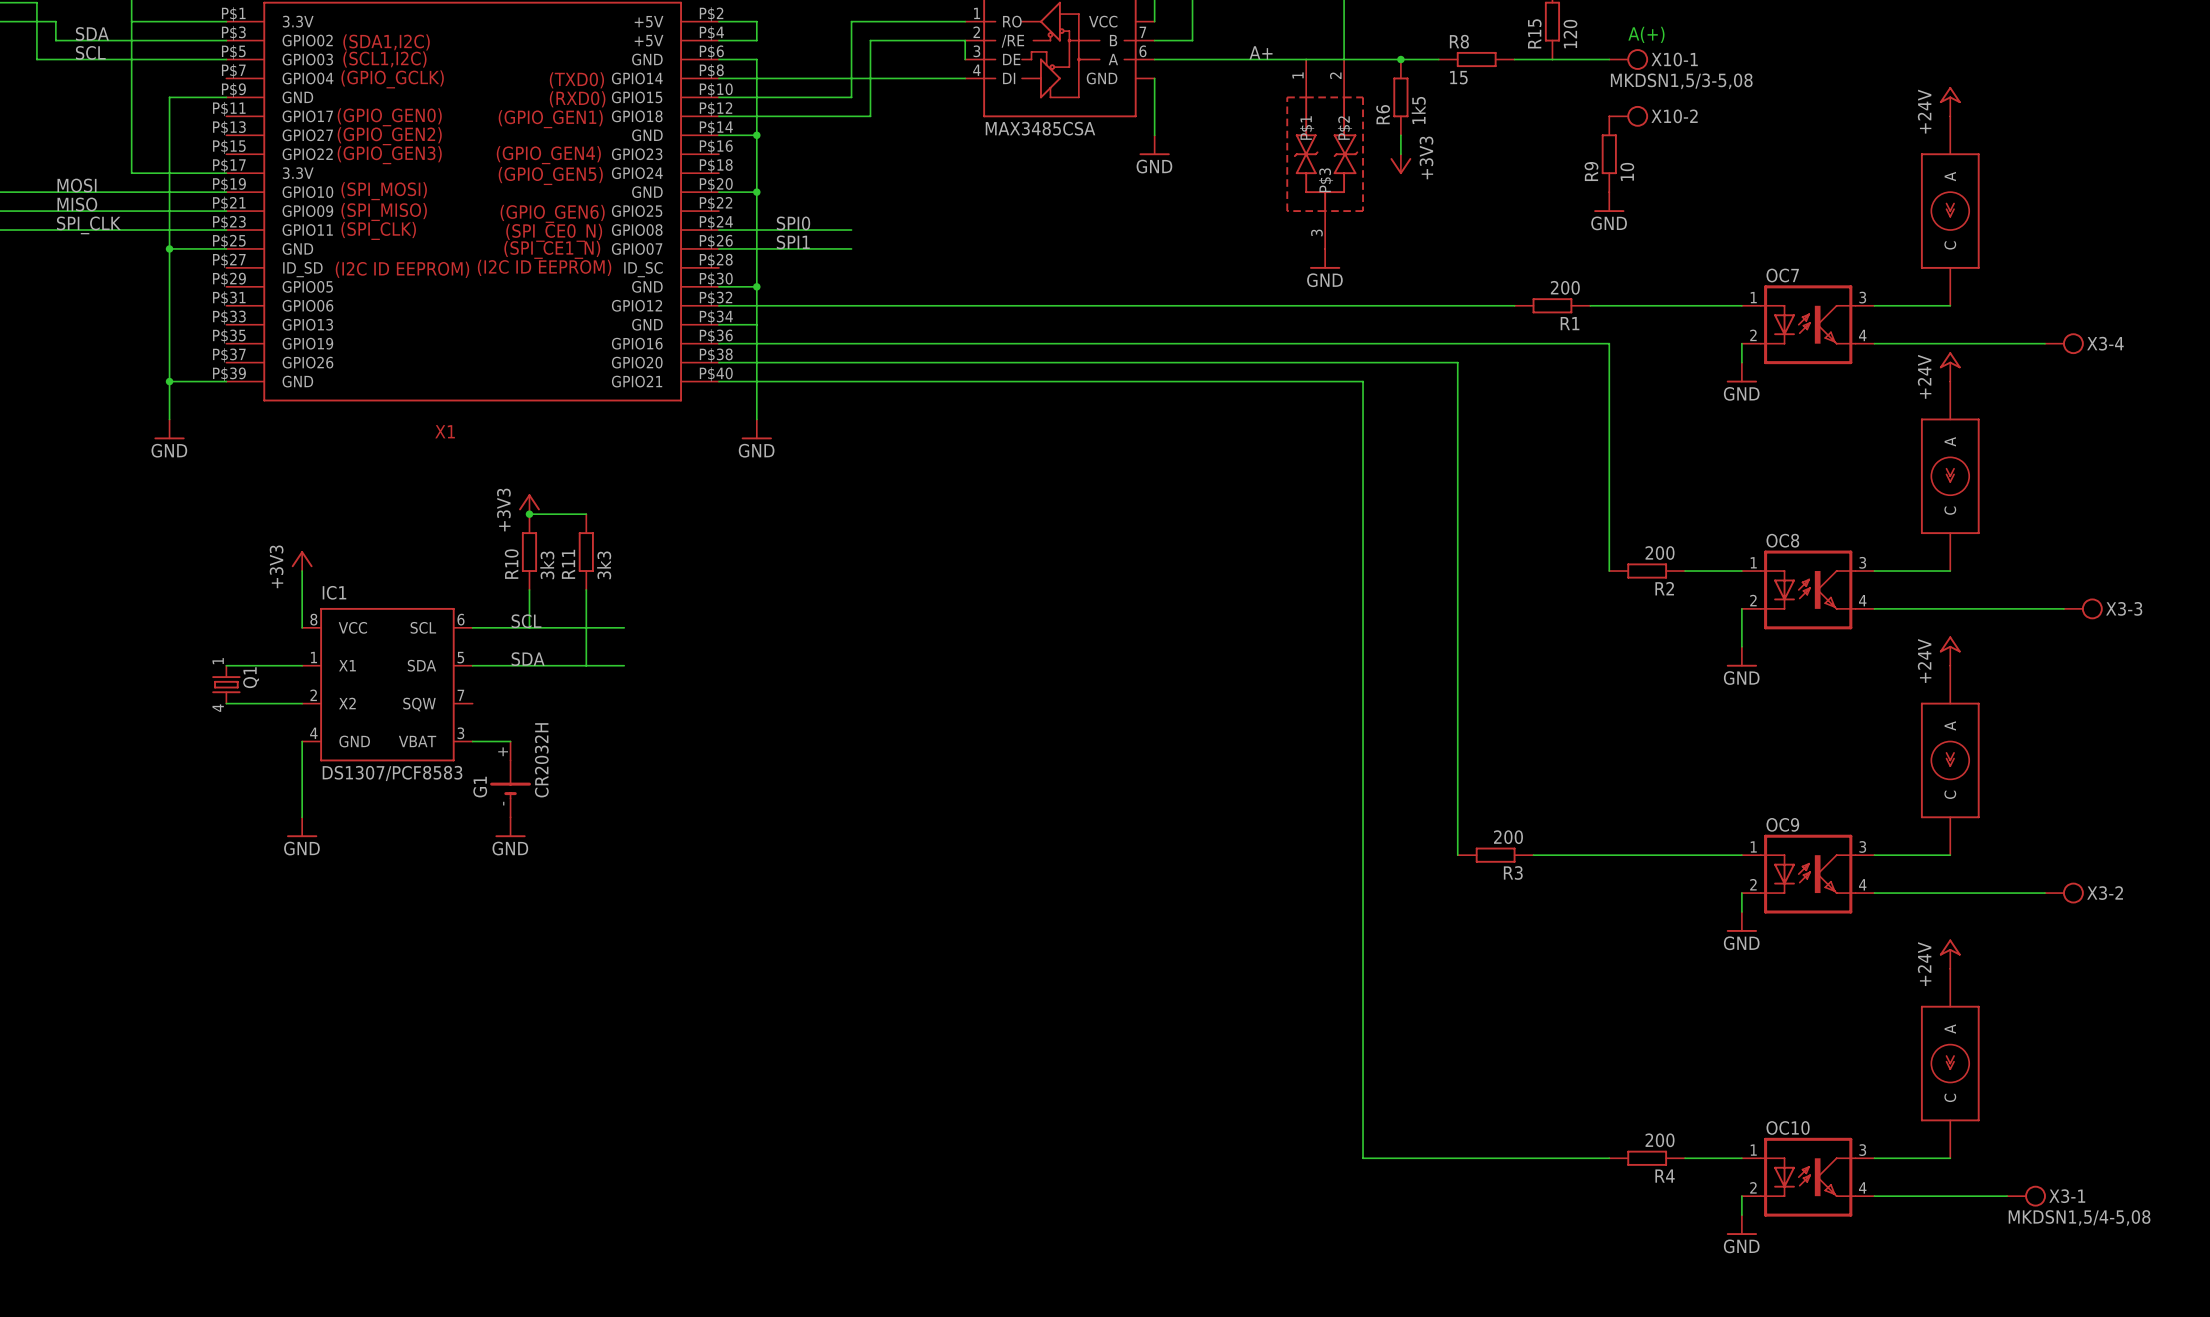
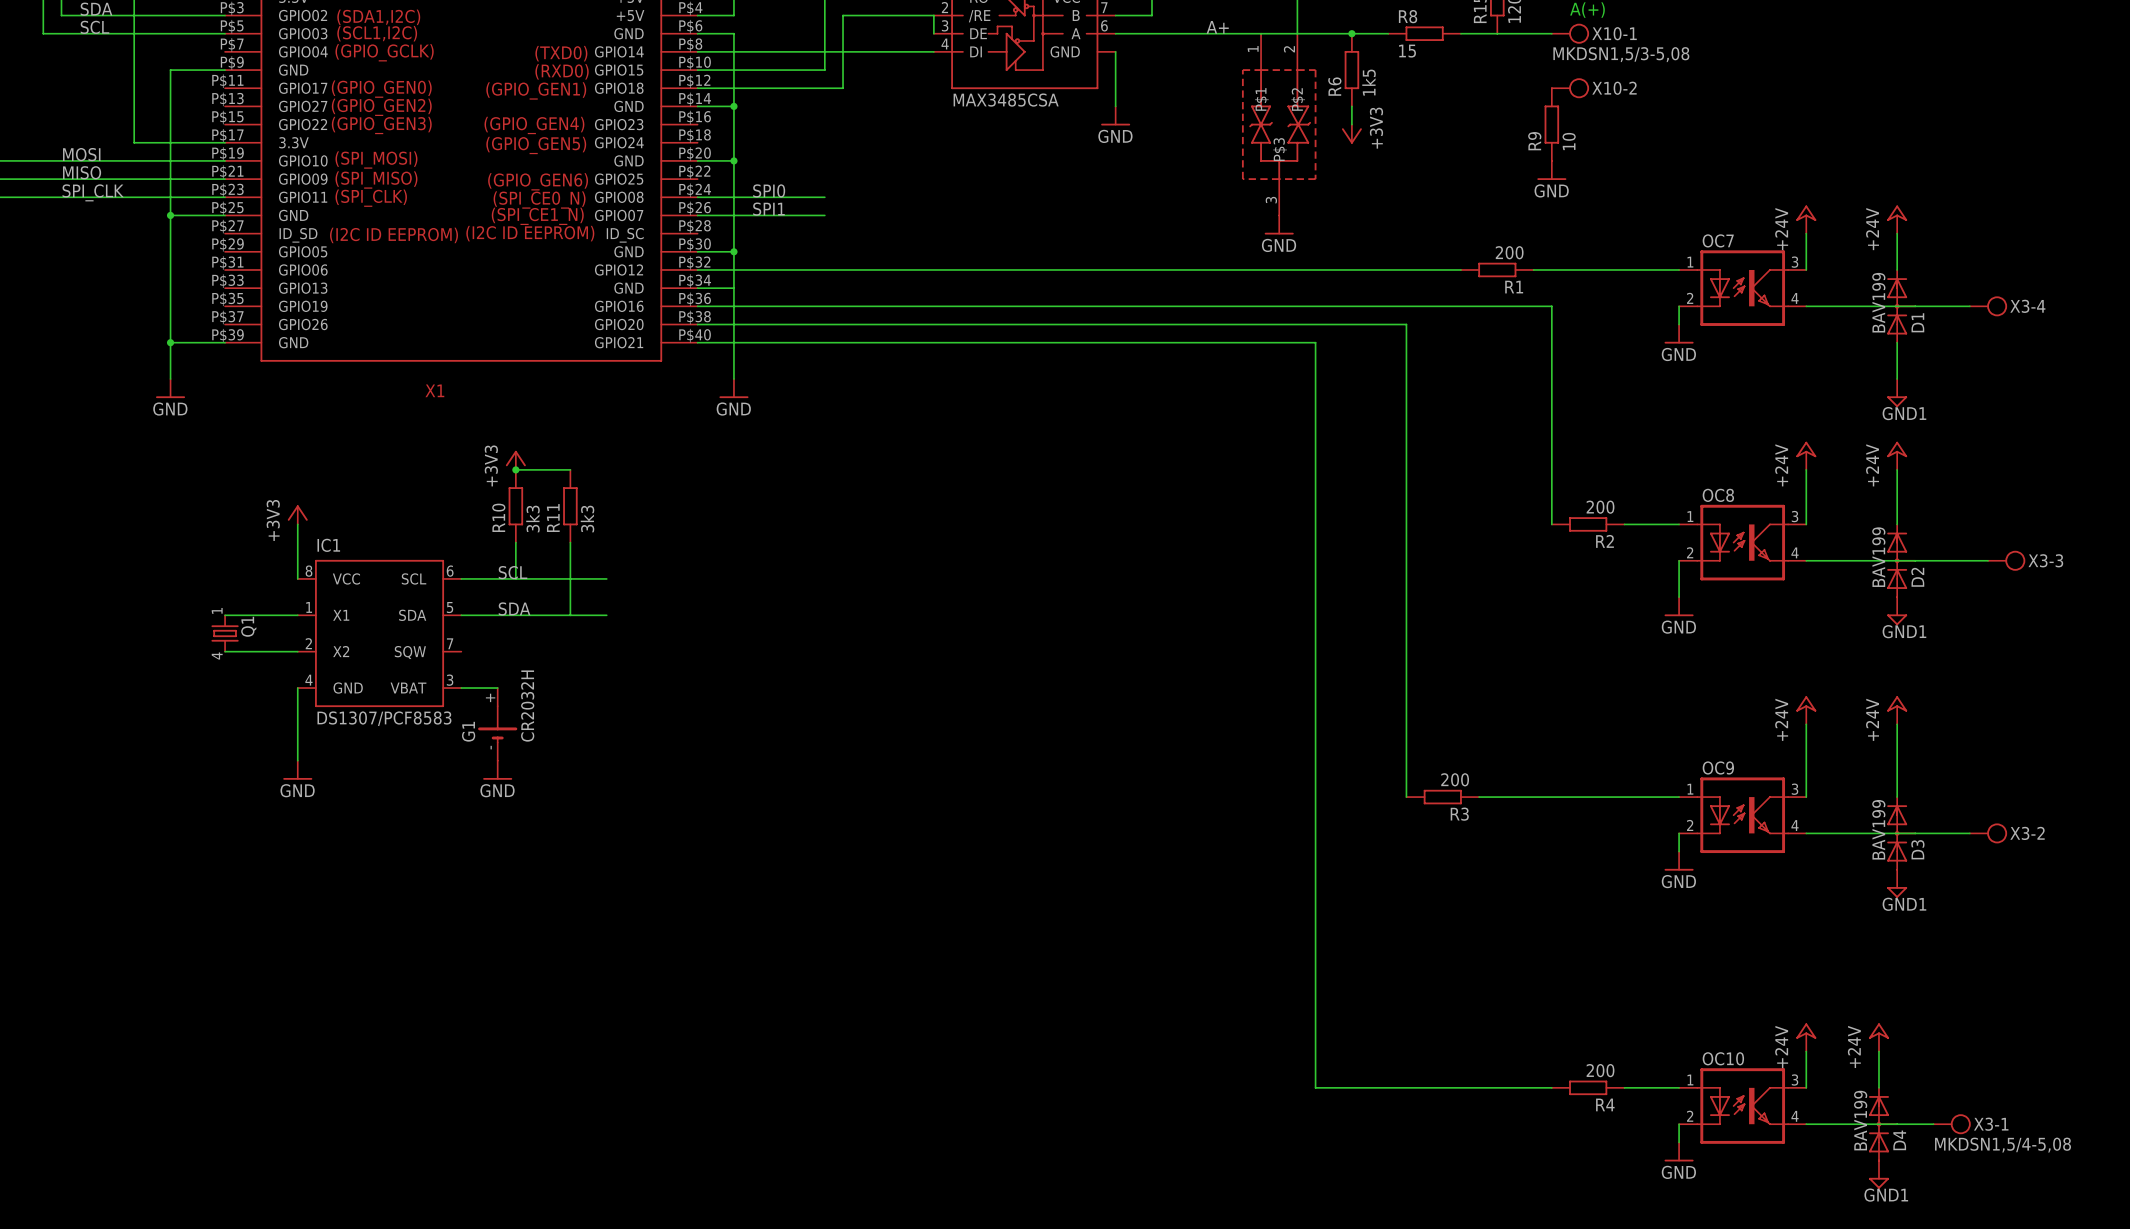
power symbol: +24V (1950, 101) -> none
part: (1950, 211) -> none
power symbol: none -> +24V (1806, 219)
power symbol: none -> +24V (1897, 219)
wire: none -> (1897, 233) (1897, 269)
wire: (1874, 305) (1950, 305) -> (1806, 269) (1806, 233)
D1: none -> BAV199 (1901, 306)
power symbol: +24V (1950, 366) -> none
wire: none -> (1897, 342) (1897, 379)
power symbol: none -> GND1 (1897, 393)
part: (1950, 476) -> none
power symbol: none -> +24V (1806, 455)
power symbol: none -> +24V (1897, 455)
wire: none -> (1897, 469) (1897, 524)
wire: (1874, 571) (1950, 571) -> (1806, 524) (1806, 469)
D2: none -> BAV199 (1901, 560)
power symbol: +24V (1950, 651) -> none
power symbol: none -> GND1 (1897, 611)
part: (1950, 760) -> none
power symbol: none -> +24V (1806, 710)
power symbol: none -> +24V (1897, 710)
wire: none -> (1897, 724) (1897, 797)
wire: (1874, 855) (1950, 855) -> (1806, 797) (1806, 724)
D3: none -> BAV199 (1901, 833)
power symbol: none -> GND1 (1897, 883)
power symbol: +24V (1950, 954) -> none
part: (1950, 1063) -> none
power symbol: none -> +24V (1806, 1037)
power symbol: none -> +24V (1878, 1037)
wire: (1874, 1158) (1950, 1158) -> (1806, 1087) (1806, 1051)
D4: none -> BAV199 (1883, 1124)
power symbol: none -> GND1 (1878, 1174)

